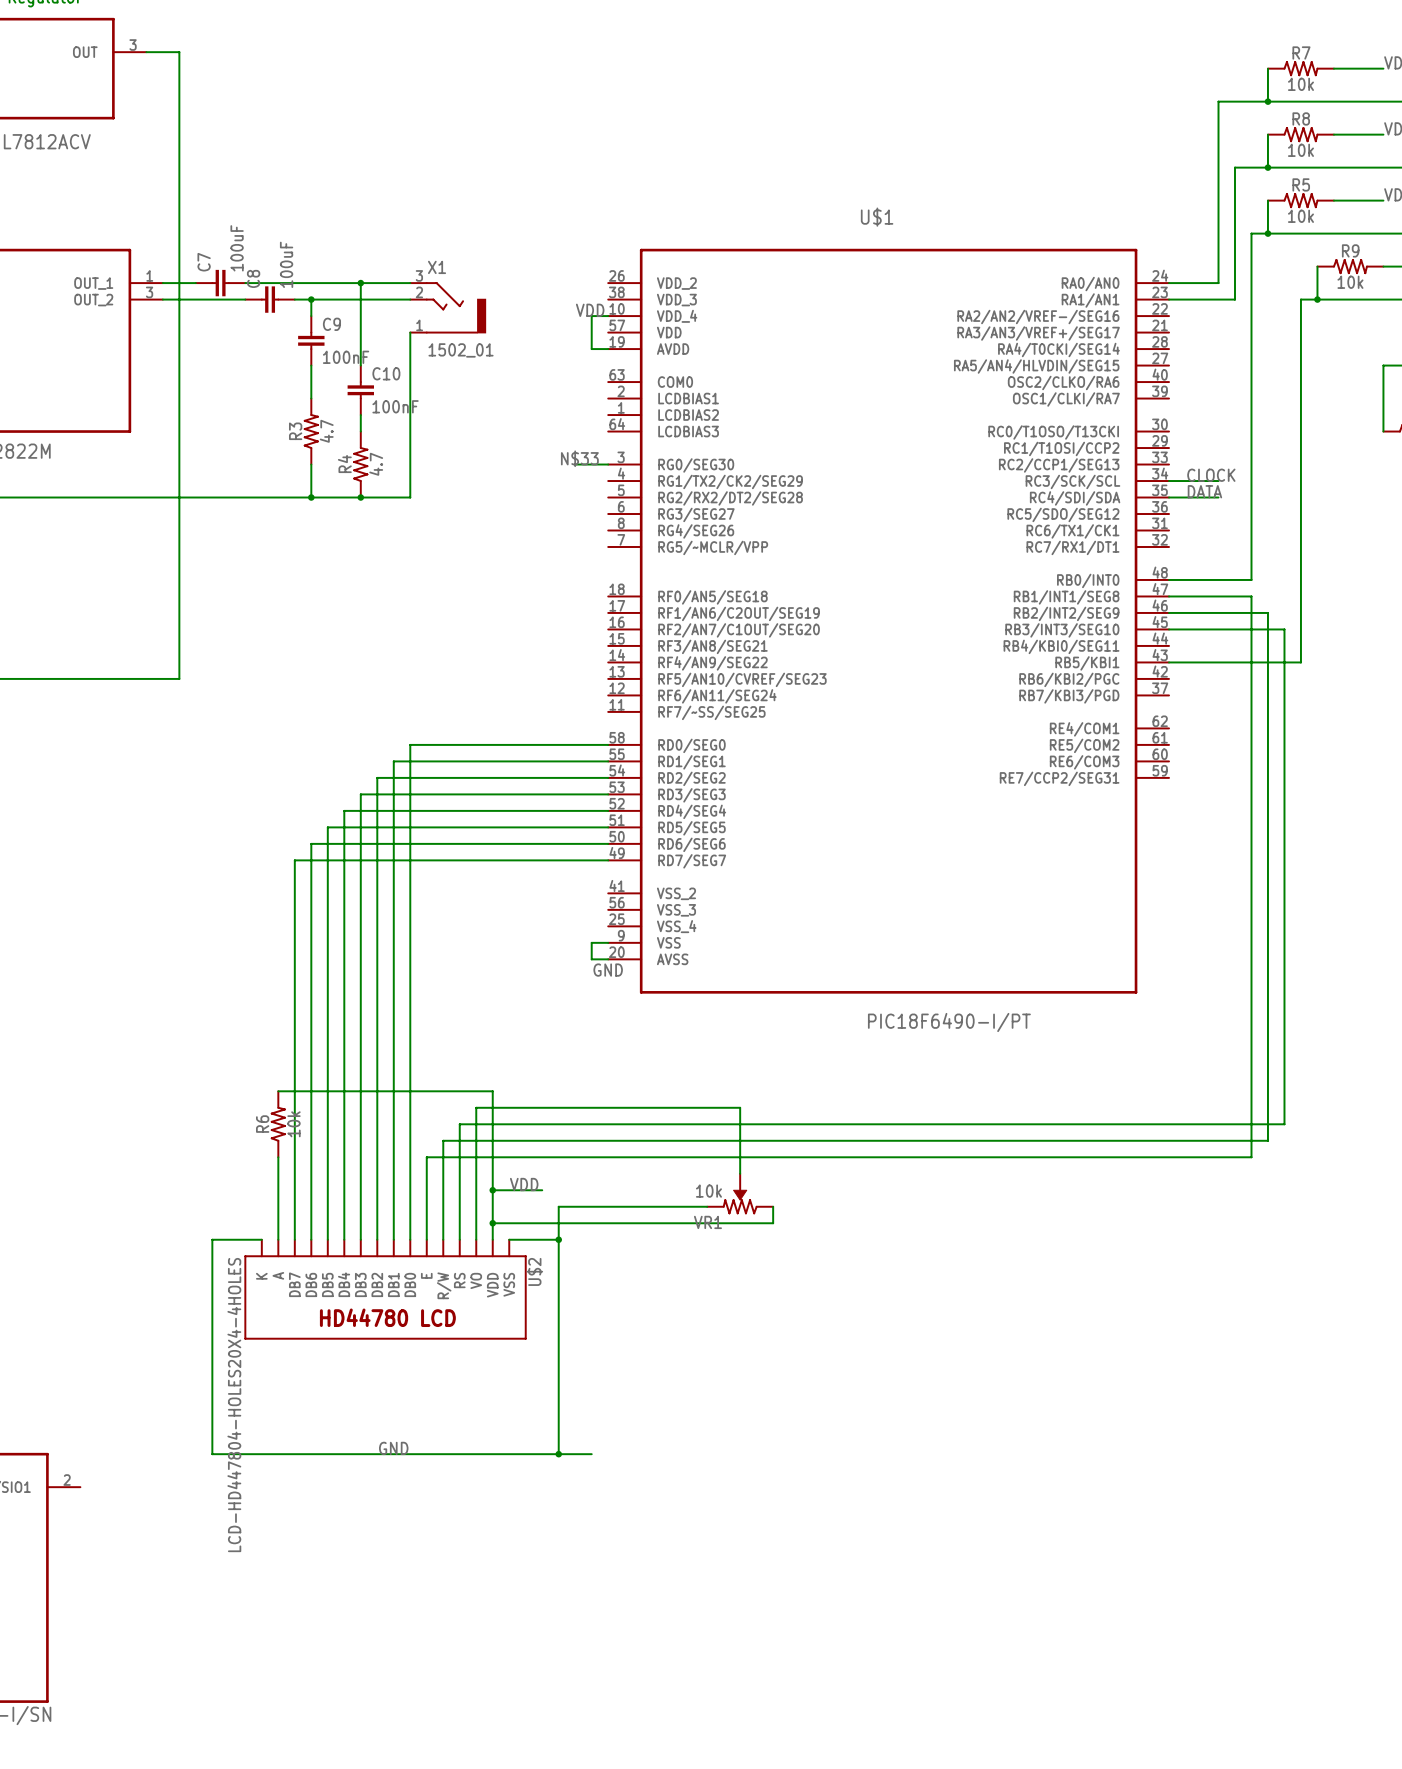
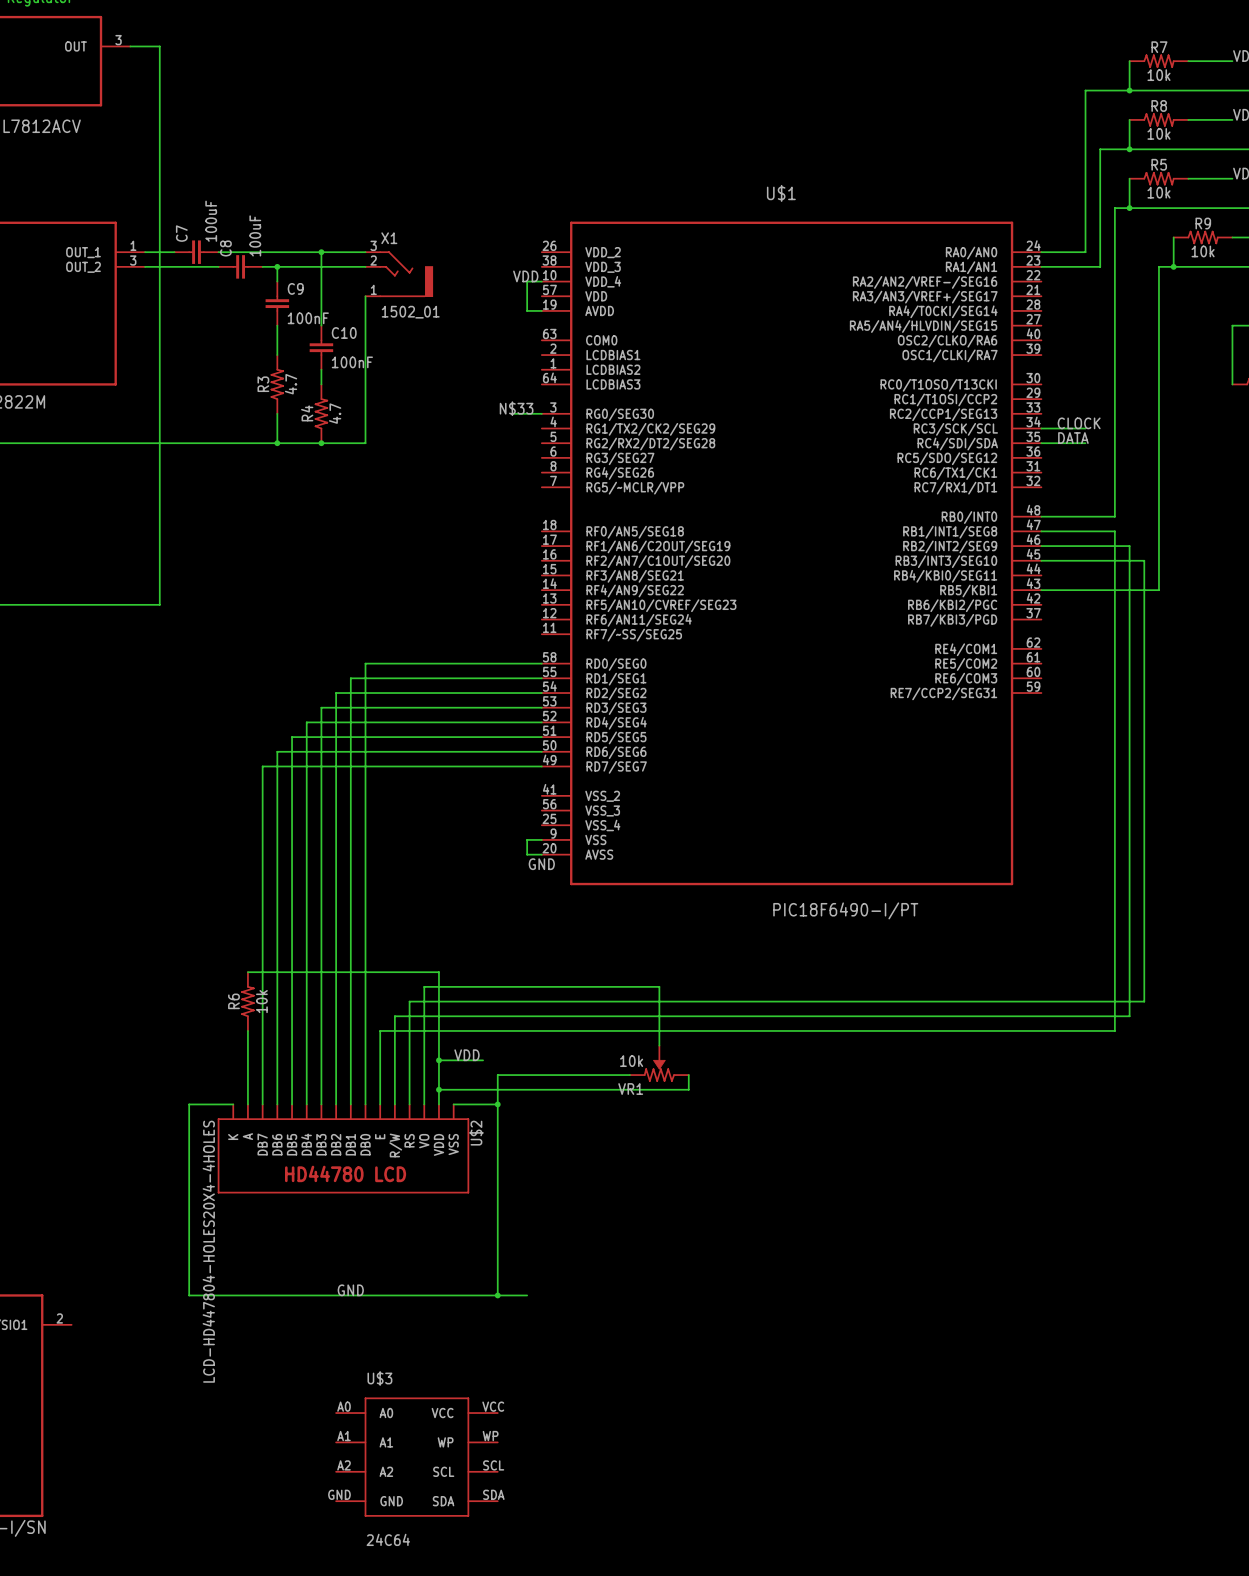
U$3: none -> 24C64 (416, 1457)

